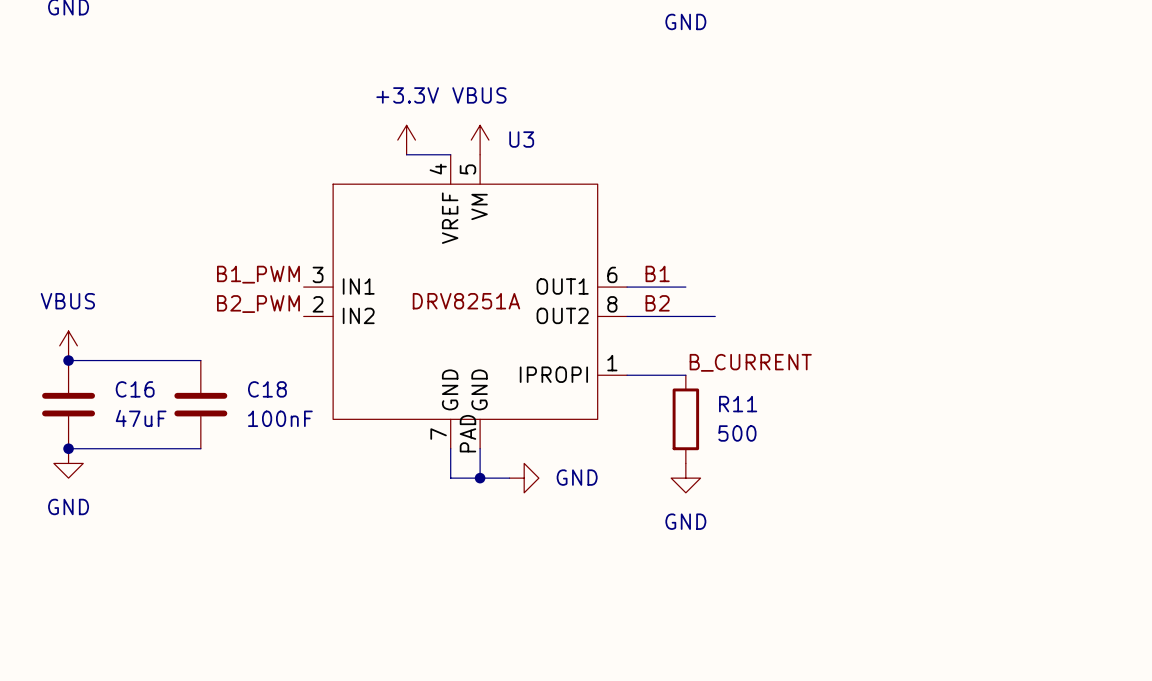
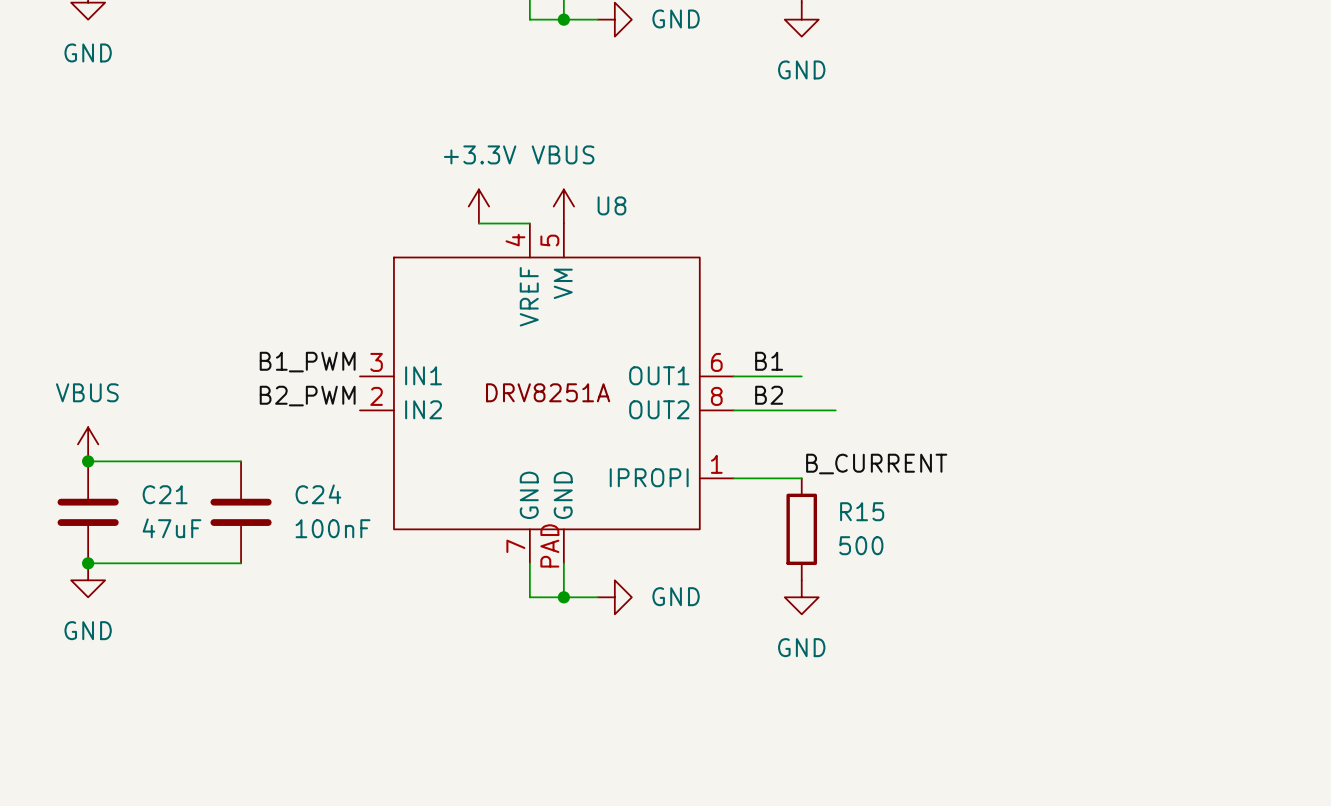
U3 name: U3 (521, 139) -> U8 (611, 205)
C16 name: C16 (135, 389) -> C21 (165, 494)
C18 name: C18 (267, 389) -> C24 (318, 494)
R11 name: R11 (738, 404) -> R15 (862, 511)

